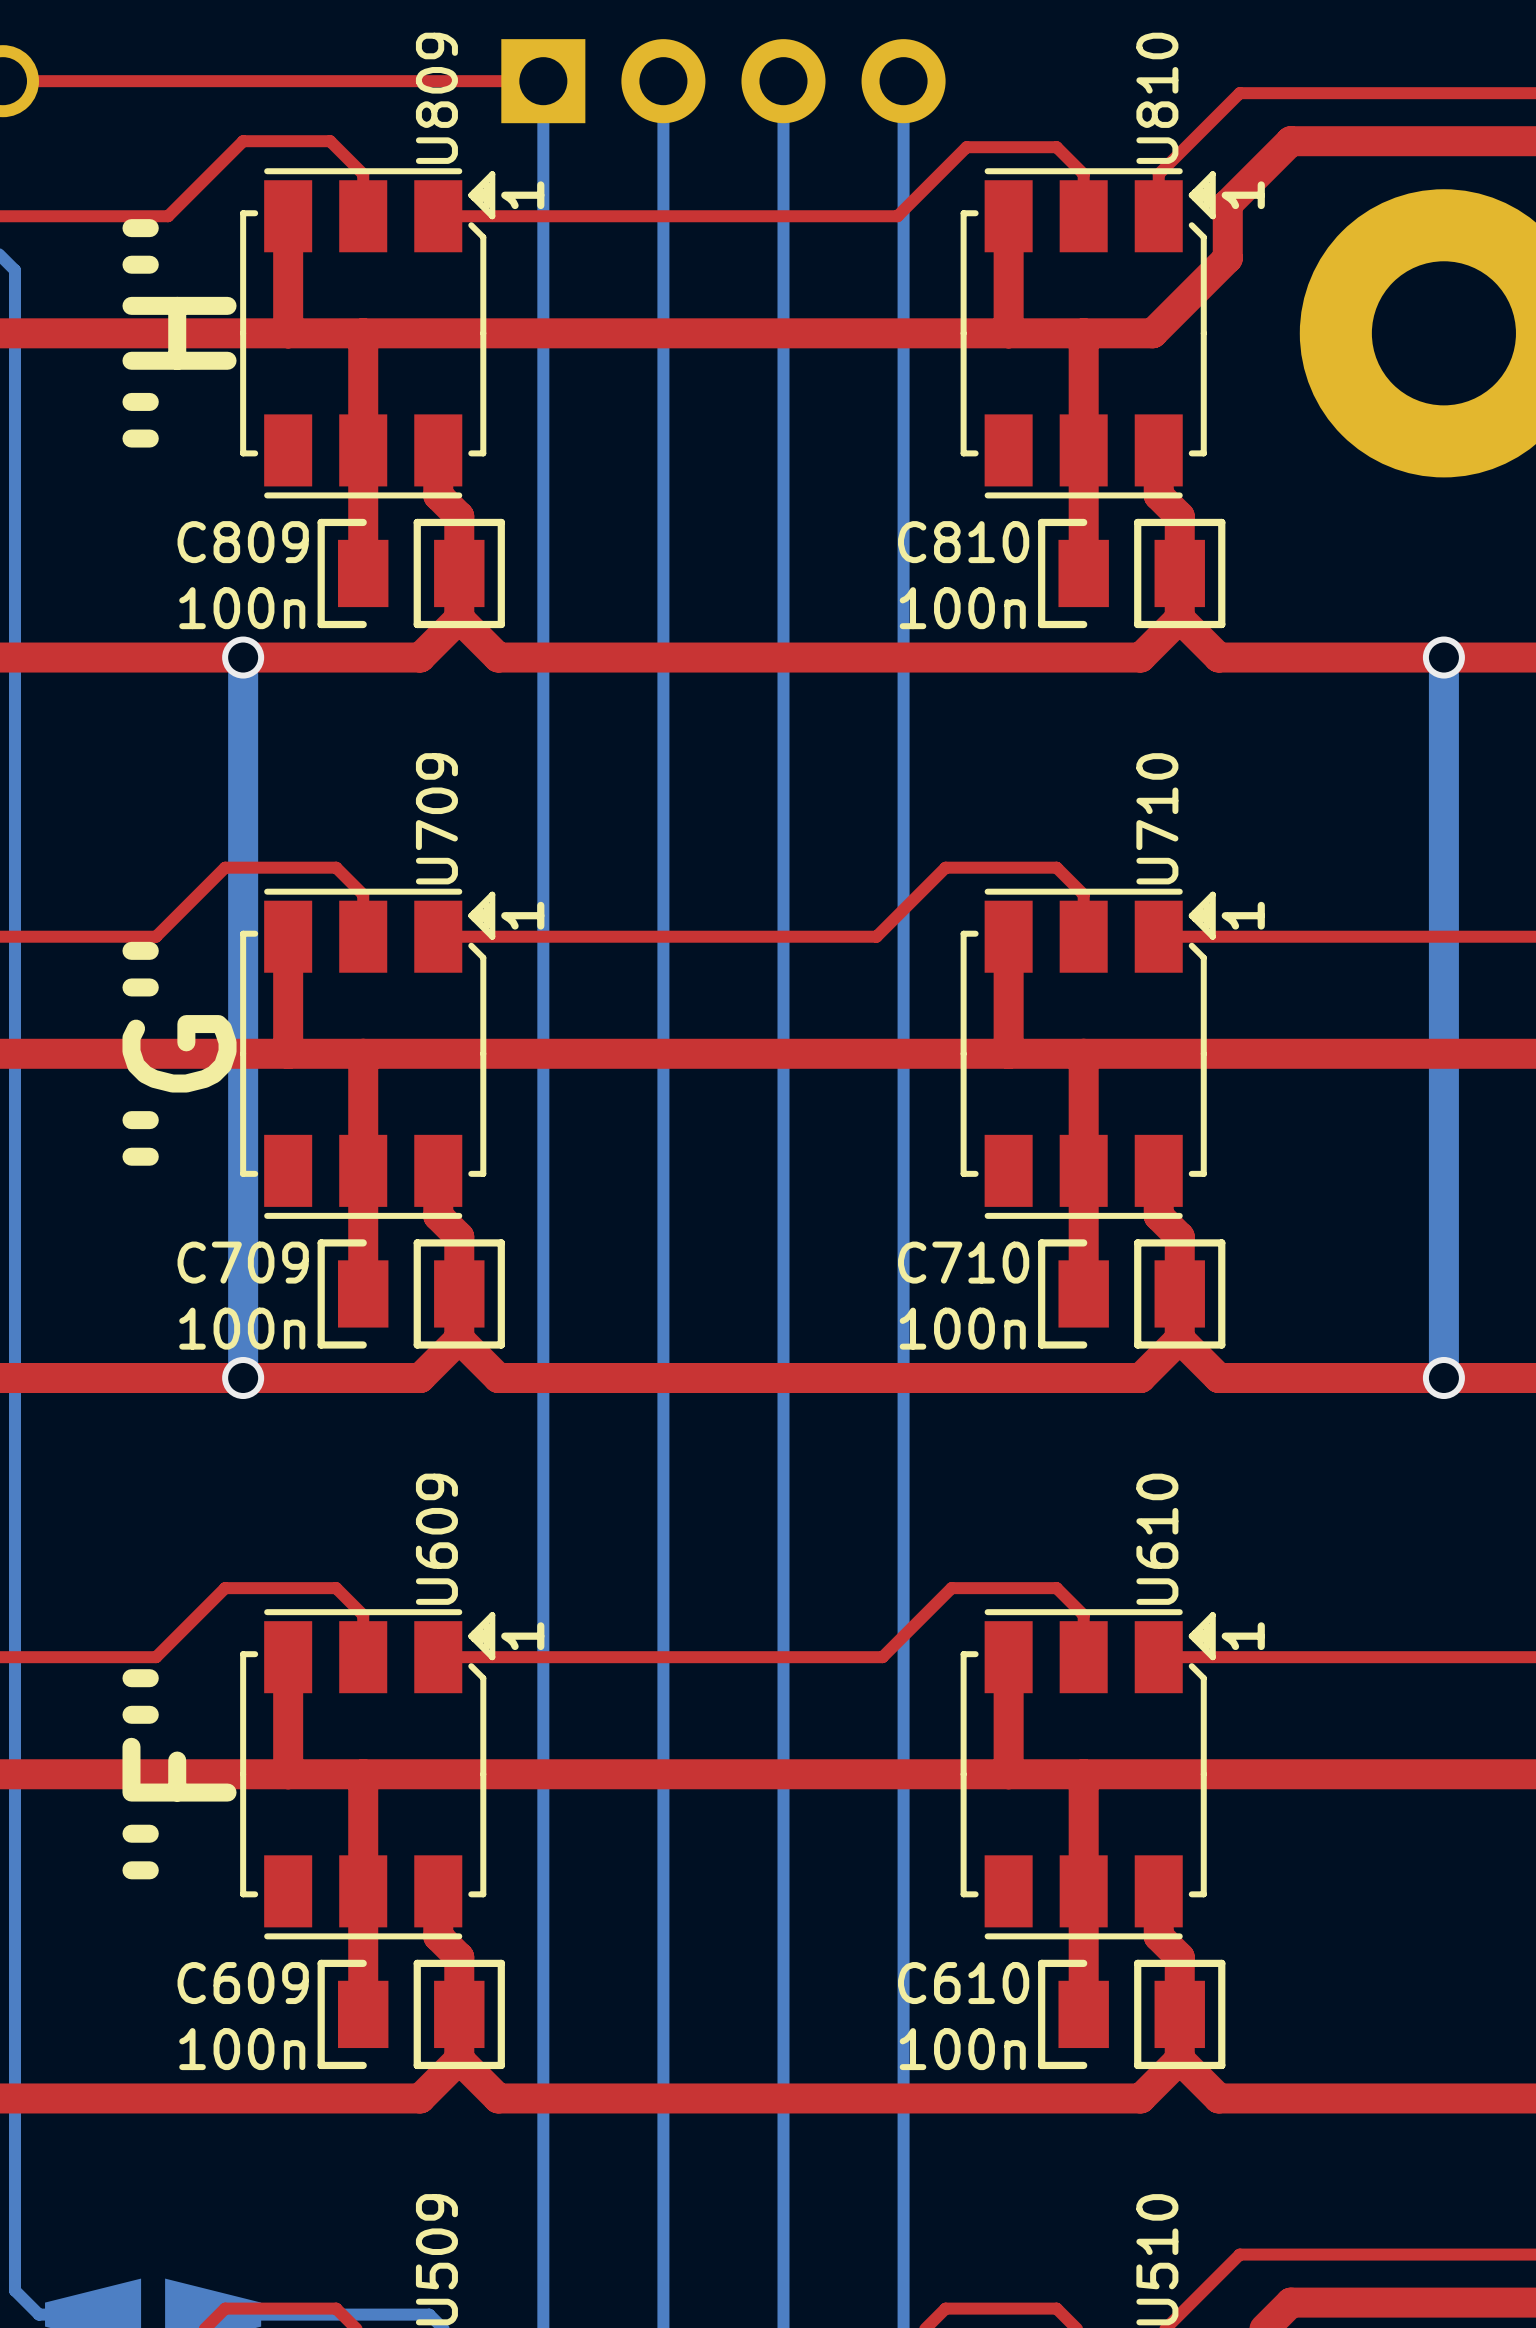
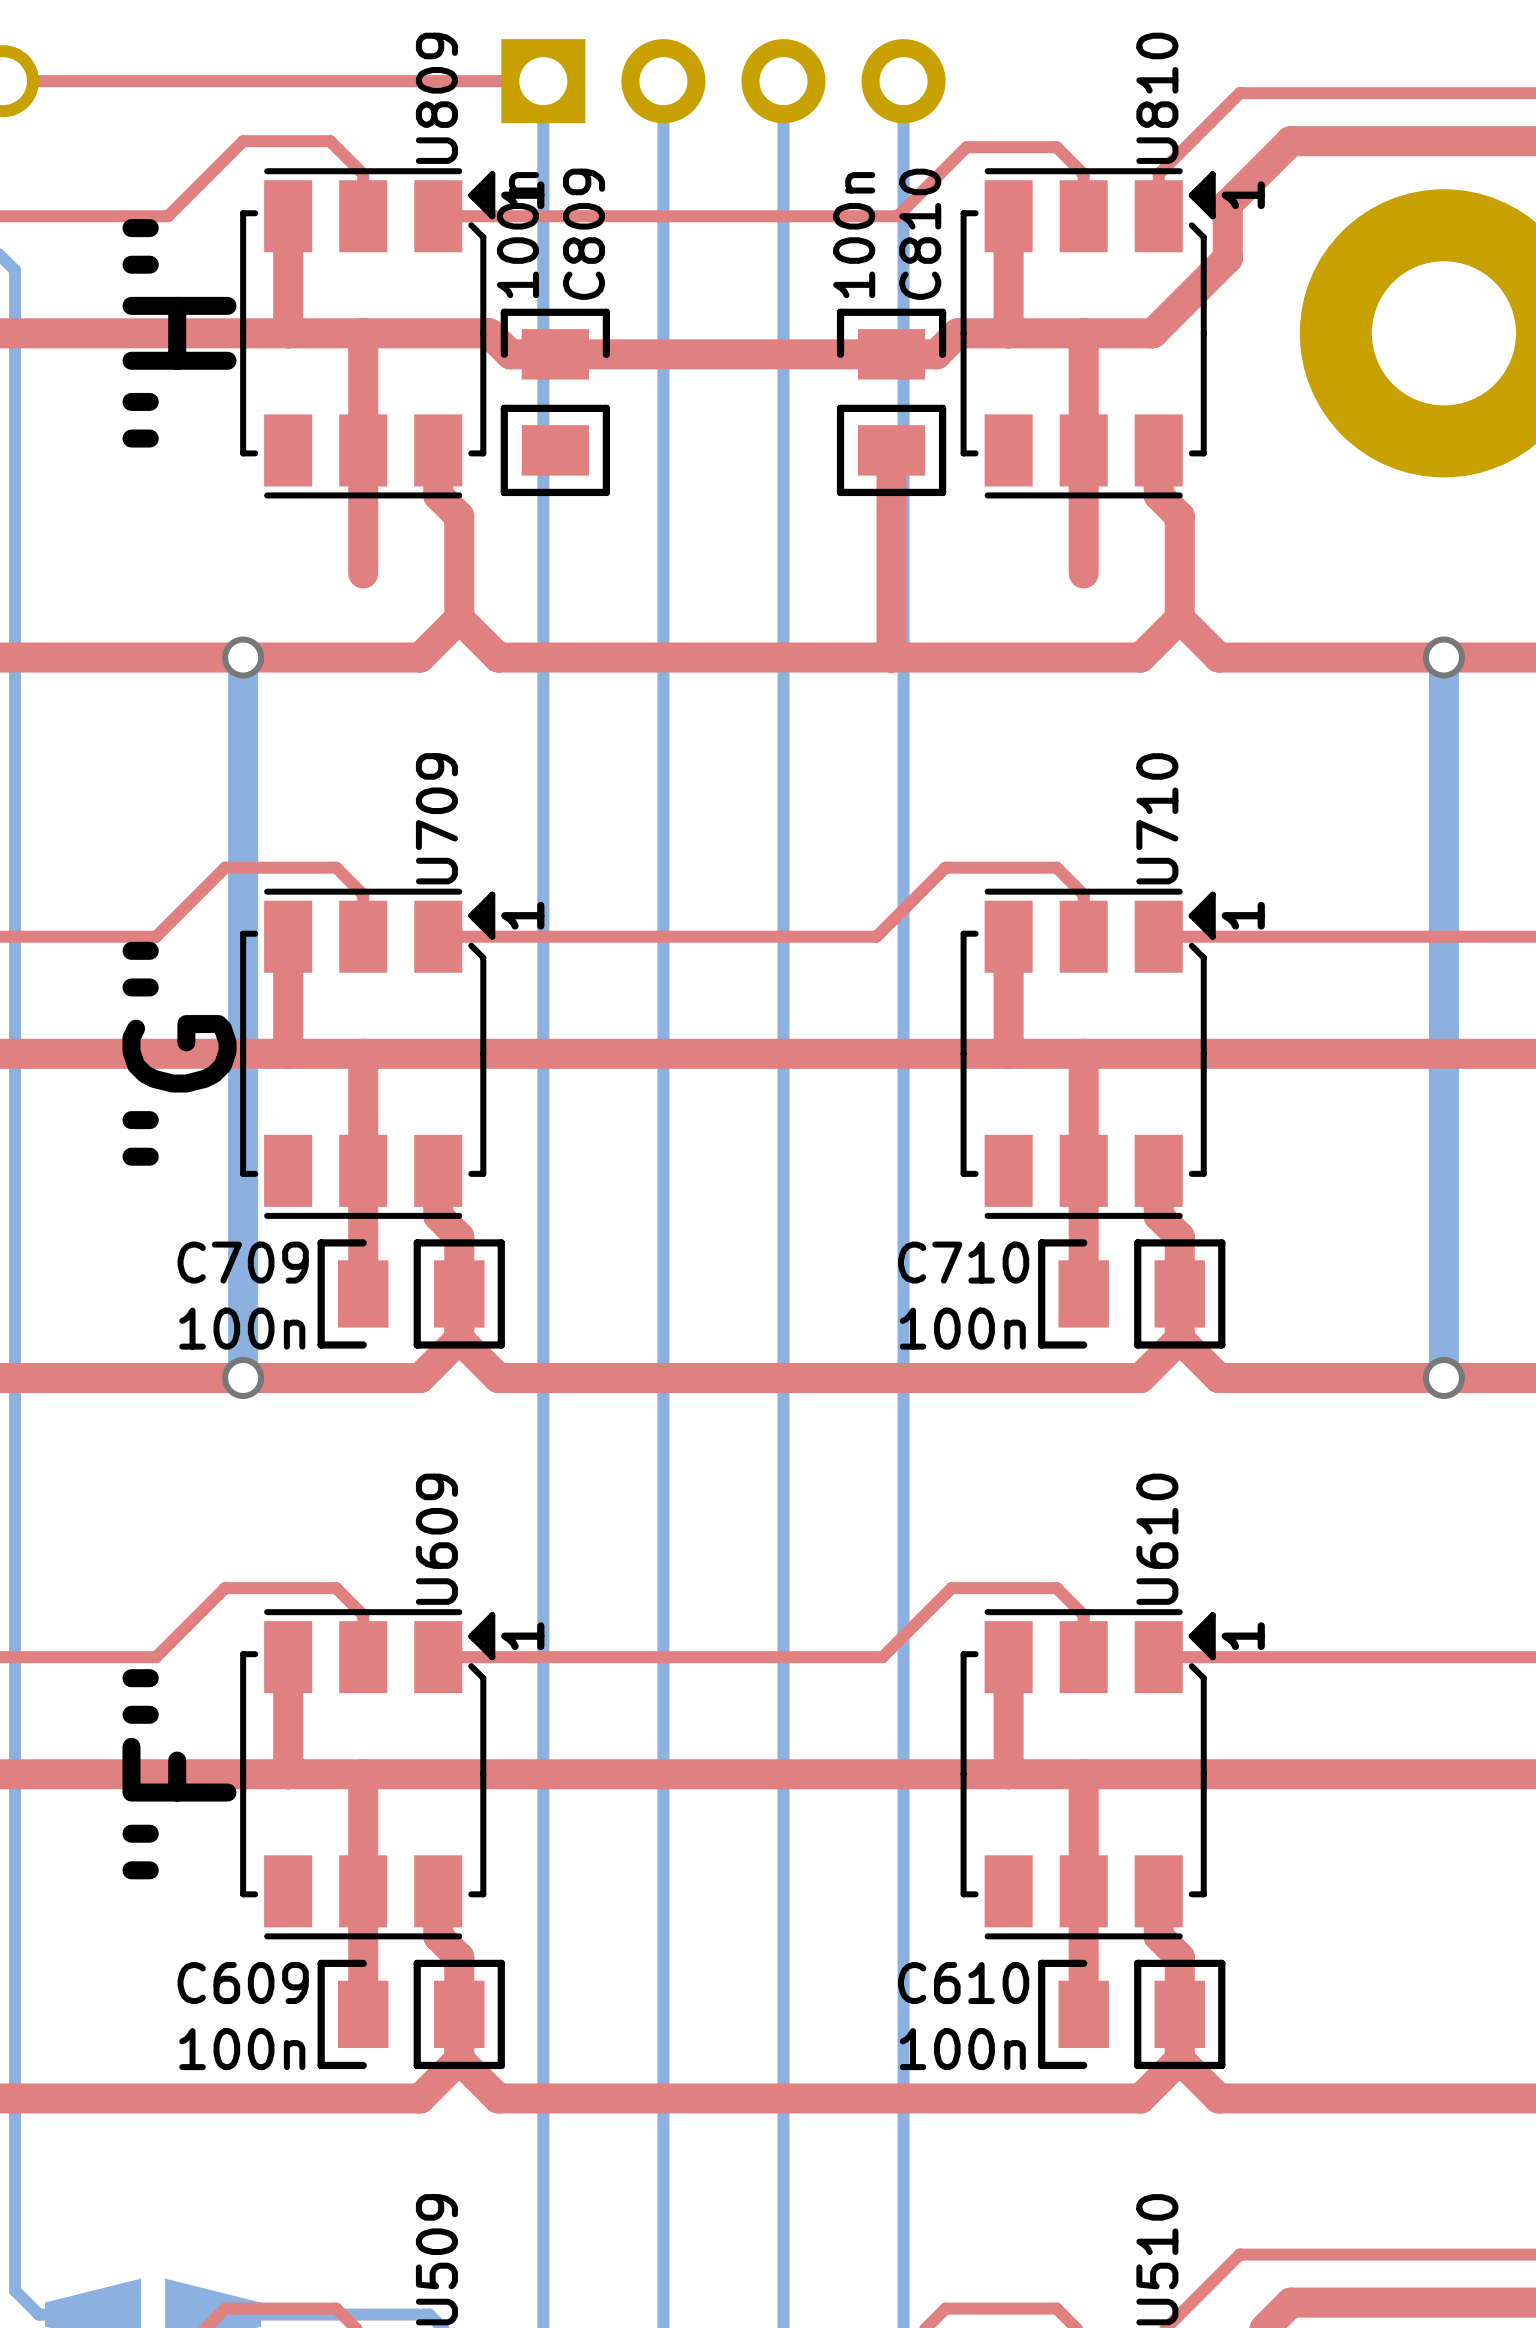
top track: (489, 333) (957, 333) -> (489, 333) (510, 354) (936, 354) (957, 333)
top track: none -> (891, 450) (891, 657)
C809 rotation: 0° (411, 573) -> 90° clockwise (555, 402)
C809 position: (411, 573) -> (555, 402)
C810 rotation: 0° (1131, 573) -> 90° clockwise (891, 402)
C810 position: (1131, 573) -> (891, 402)

